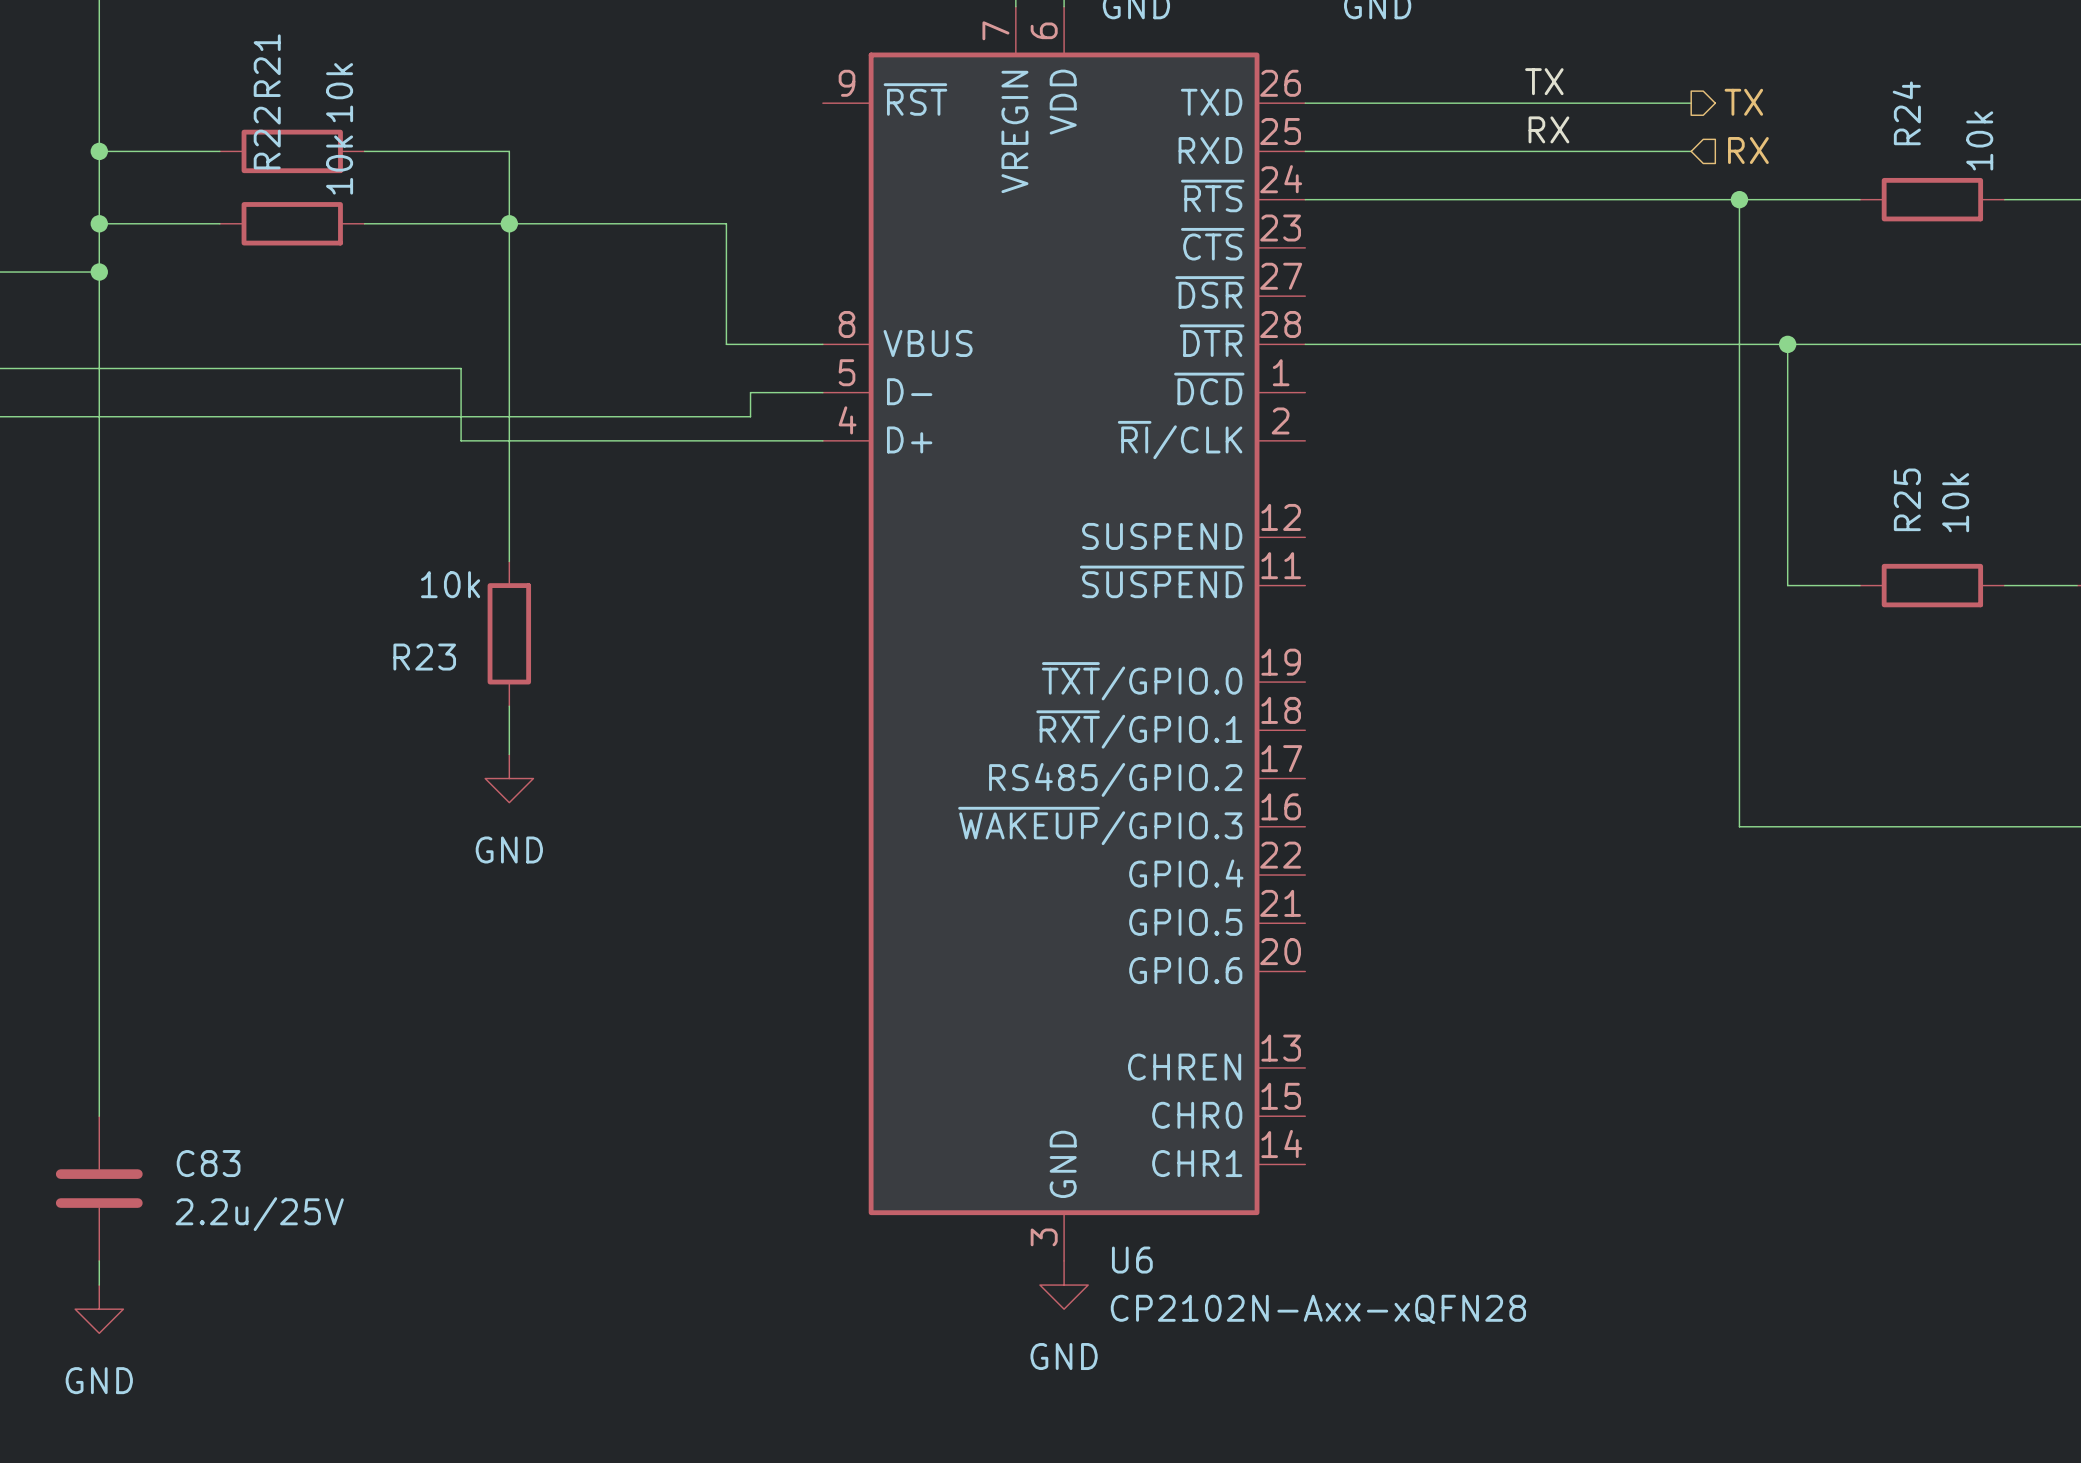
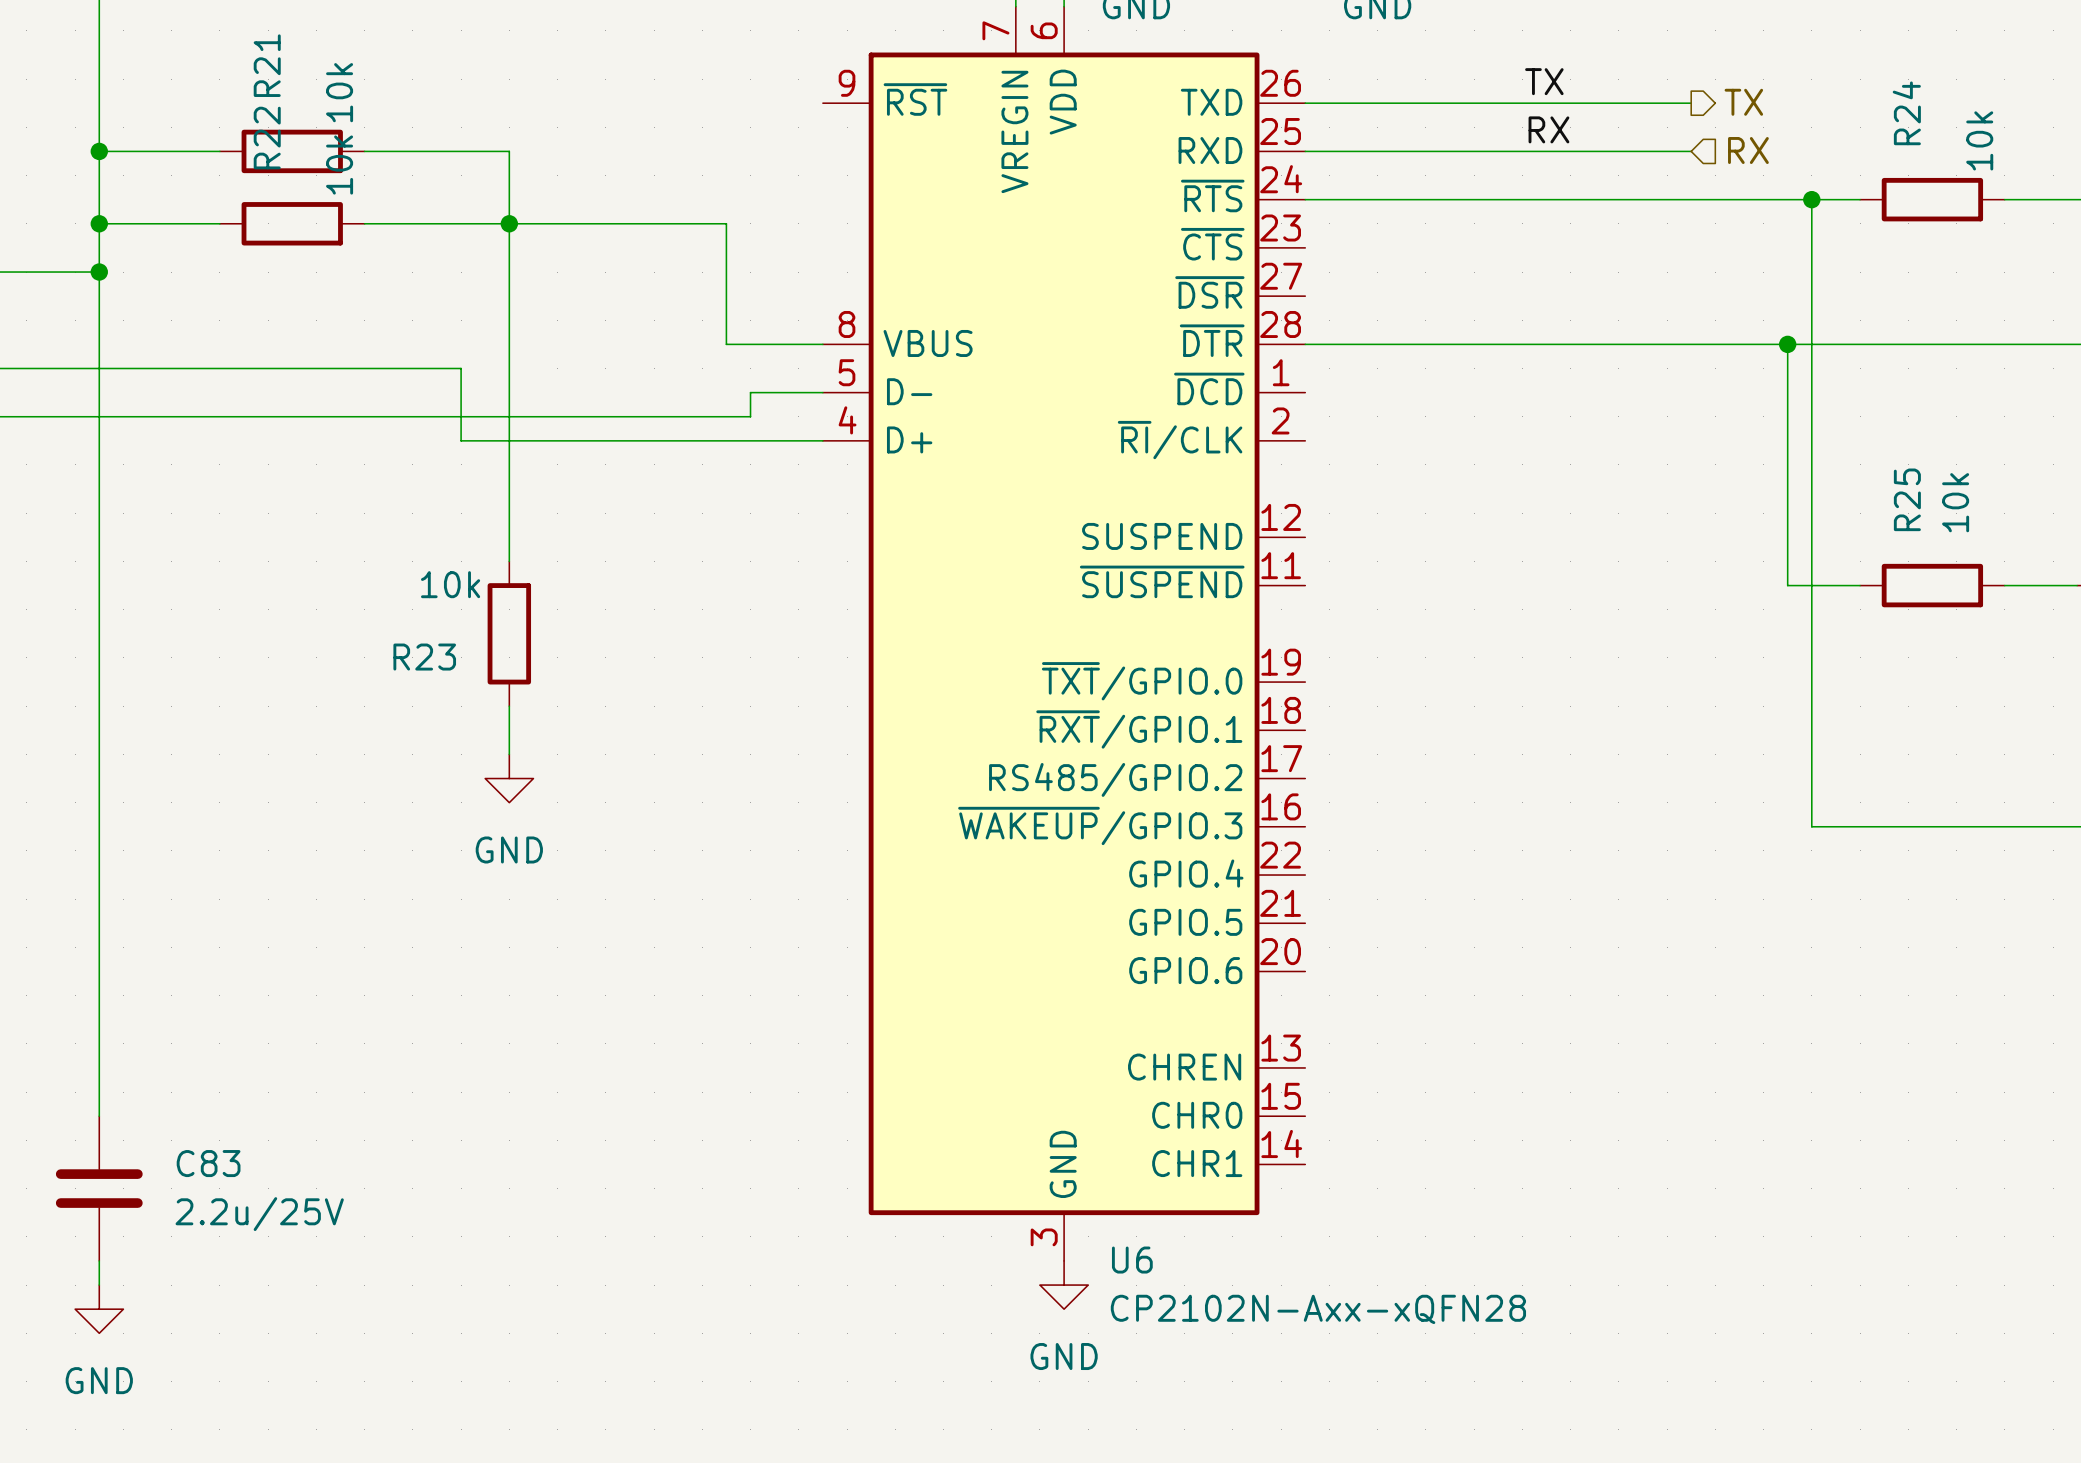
wire: (1739, 199) (1739, 826) (1811, 826) -> (1811, 199) (1811, 826)
junction position: (1739, 199) -> (1811, 199)

